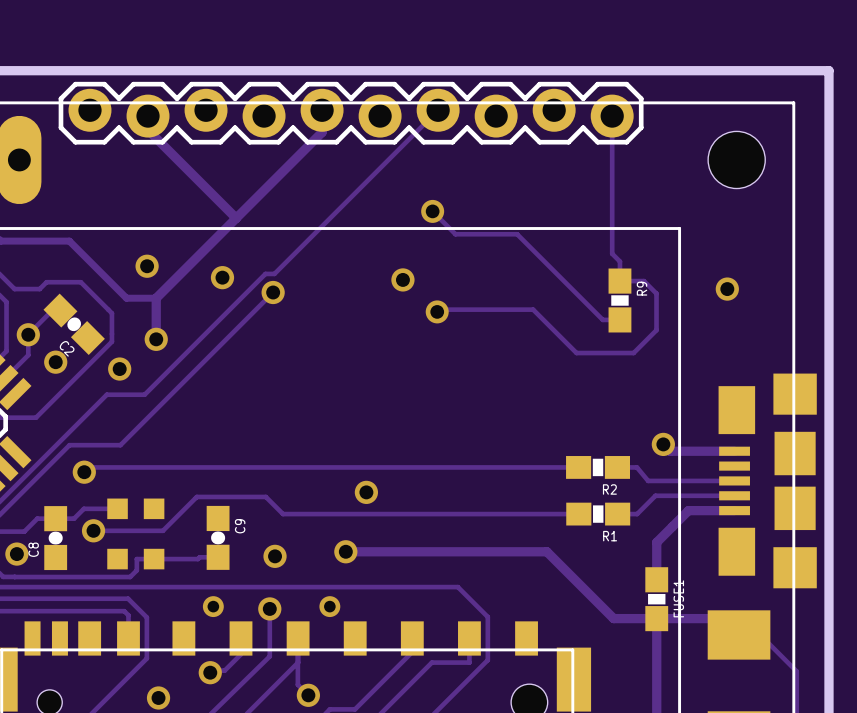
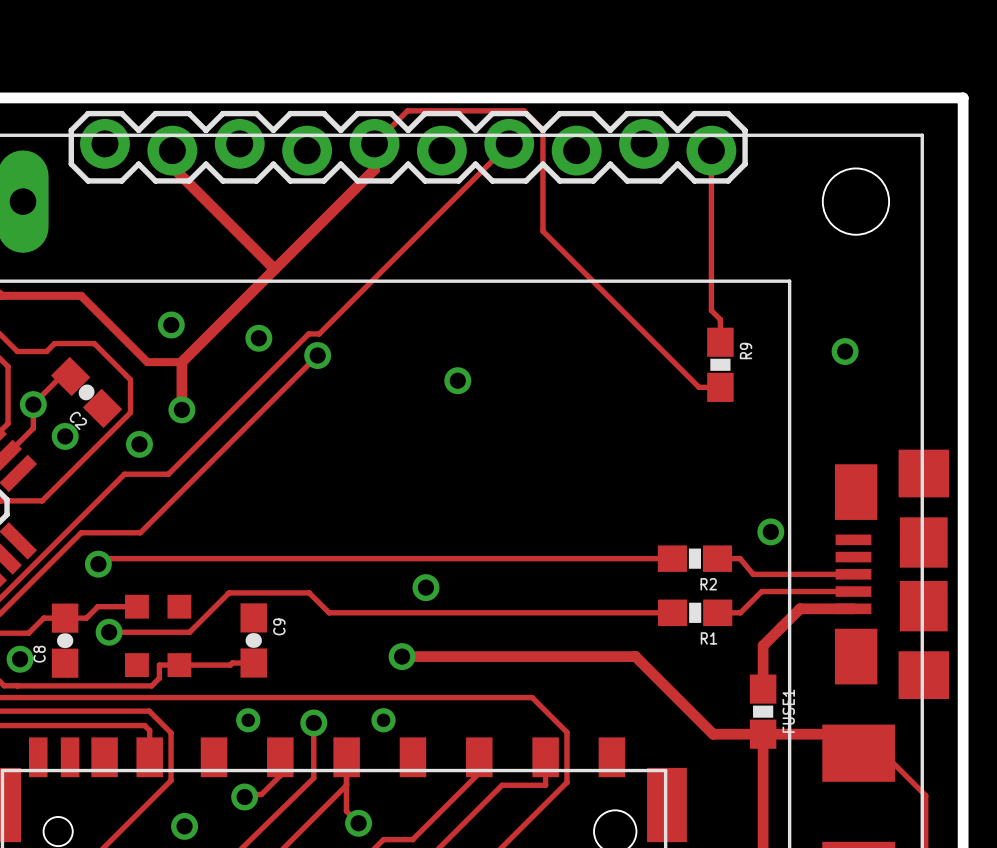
track: (432, 211) (455, 234) (517, 234) (602, 319) -> (374, 143) (407, 110) (523, 110) (542, 129) (542, 231) (700, 387)
via: (432, 211) -> none
via position: (402, 279) -> (457, 380)
track: (619, 281) (643, 281) (656, 293) (656, 330) (633, 353) (576, 353) (533, 309) (439, 309) (437, 311) -> none
via: (437, 311) -> none
track: (663, 444) (670, 451) (734, 451) -> none
via: (275, 556) -> none

